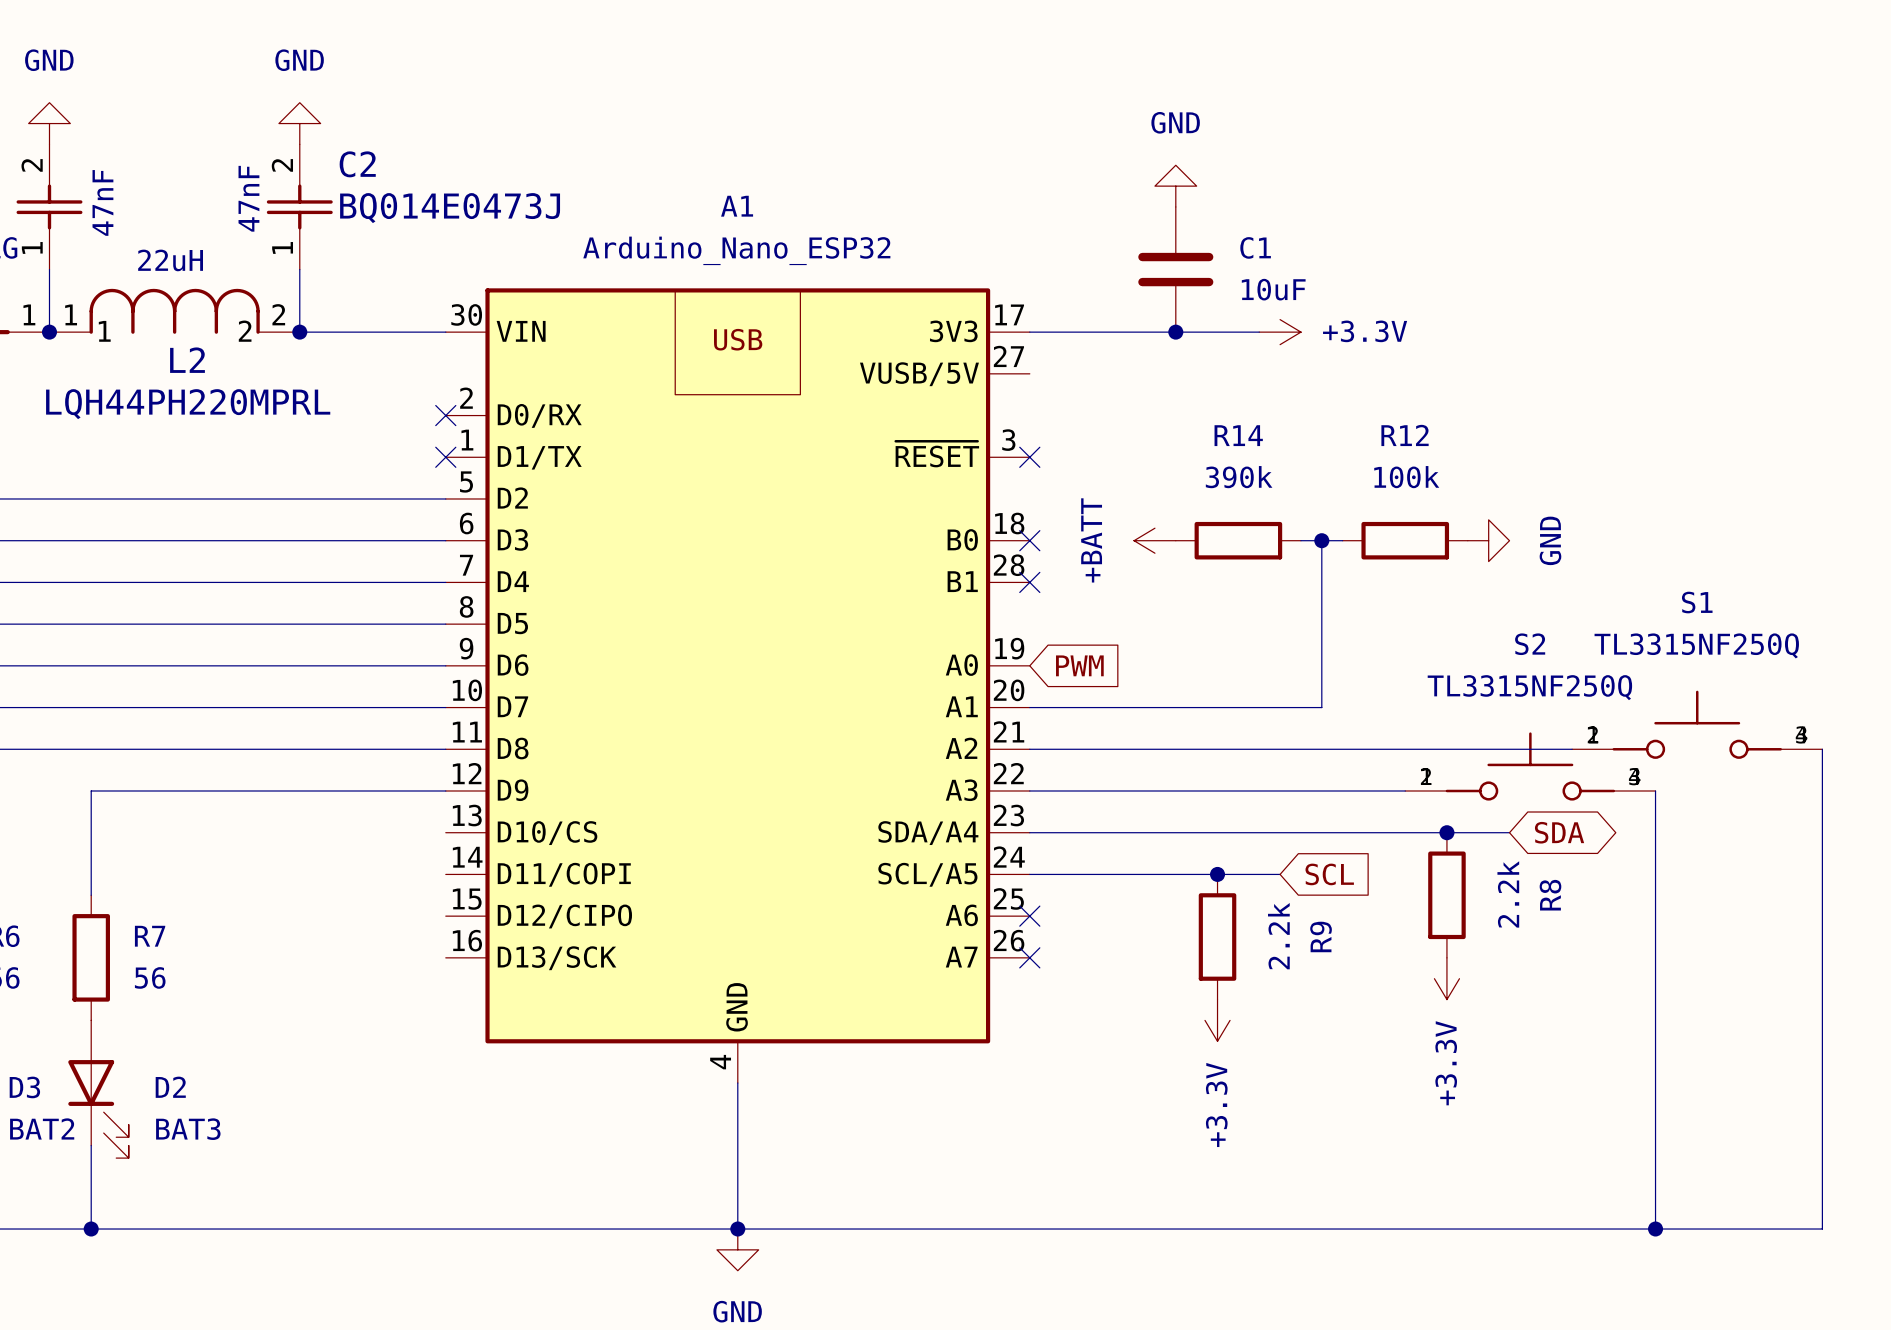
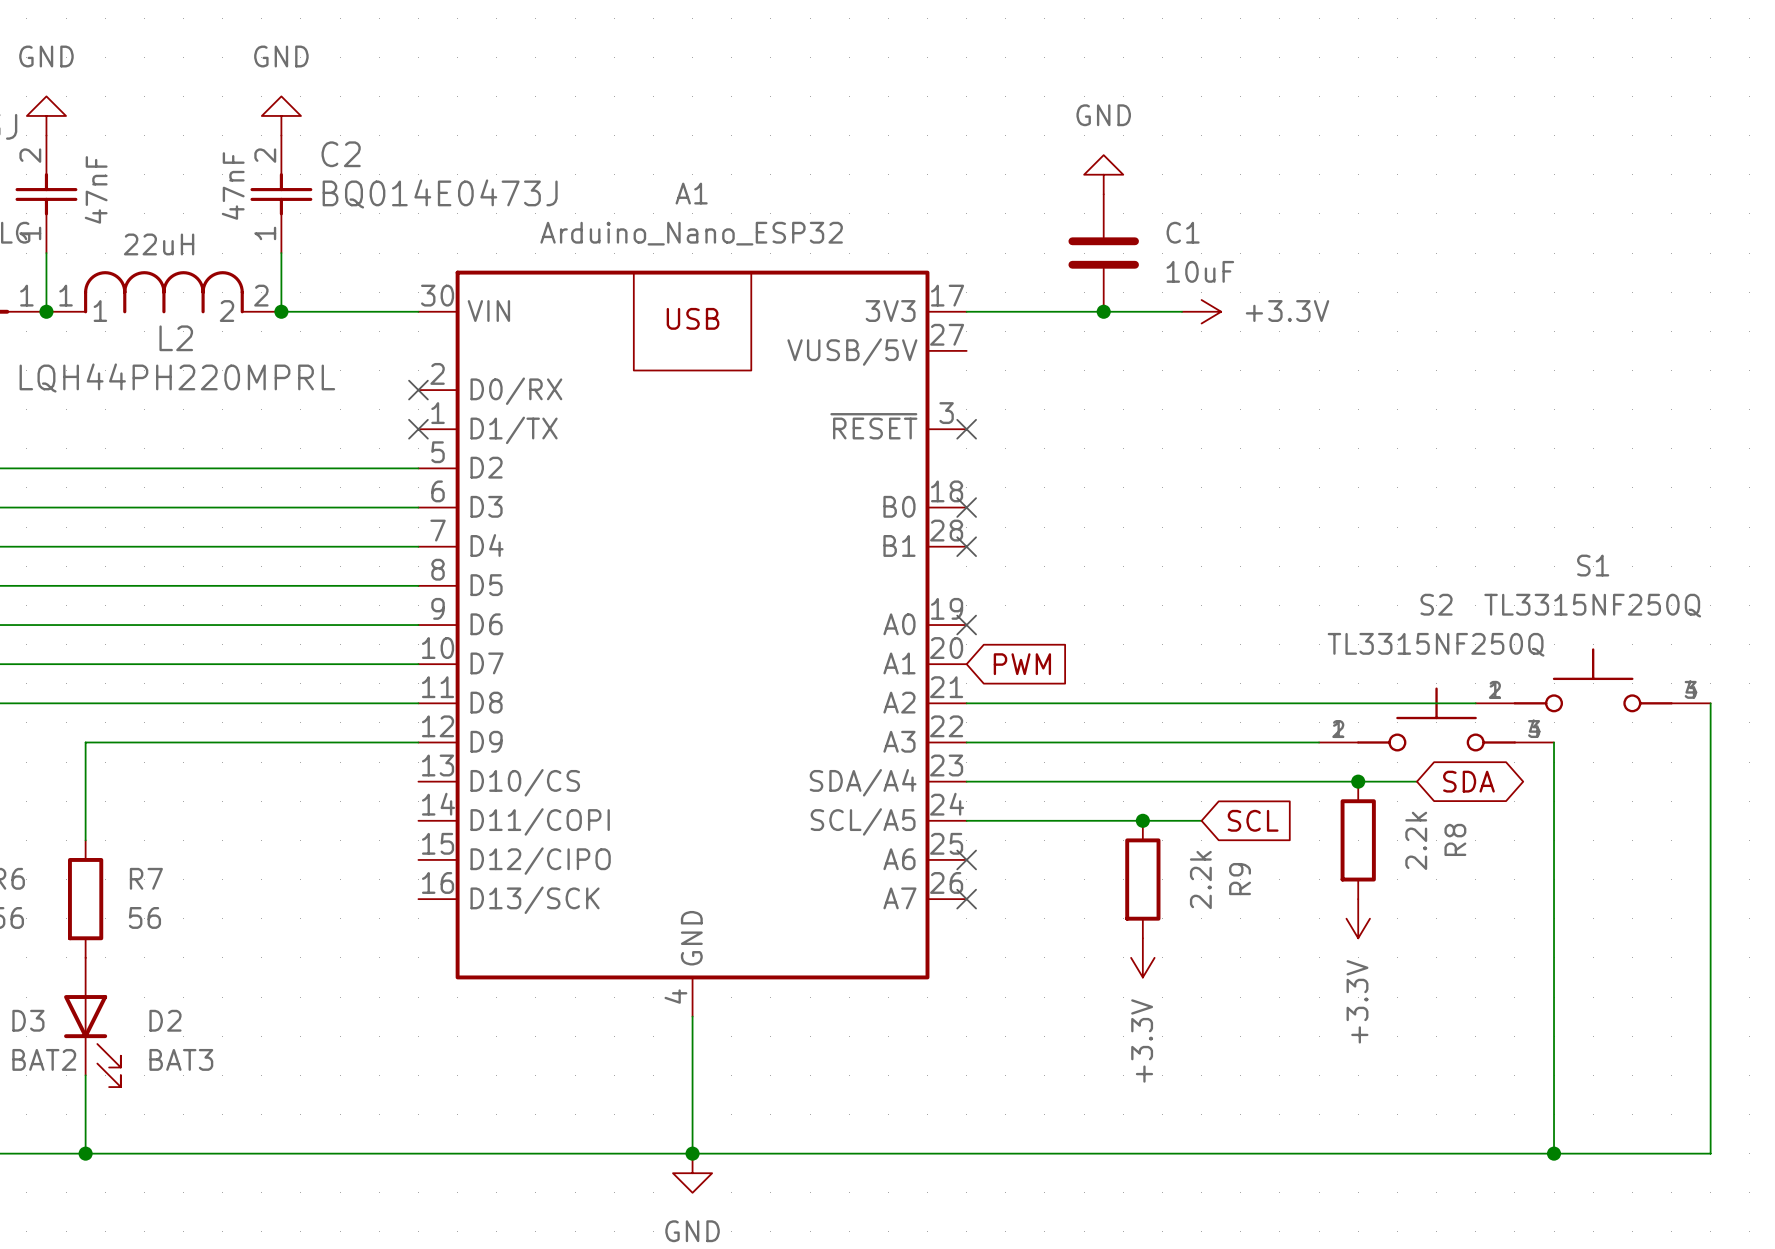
power symbol: +BATT (1154, 540) -> none
R14: 390k (1238, 540) -> none
wire: (1300, 540) (1342, 540) -> none
wire: (1321, 540) (1321, 707) (1029, 707) -> none
junction: (1321, 540) -> none
R12: 100k (1405, 540) -> none
power symbol: GND (1488, 540) -> none
no-connect mark: none -> (966, 625)
global label position: PWM (1079, 665) -> PWM (1022, 664)

